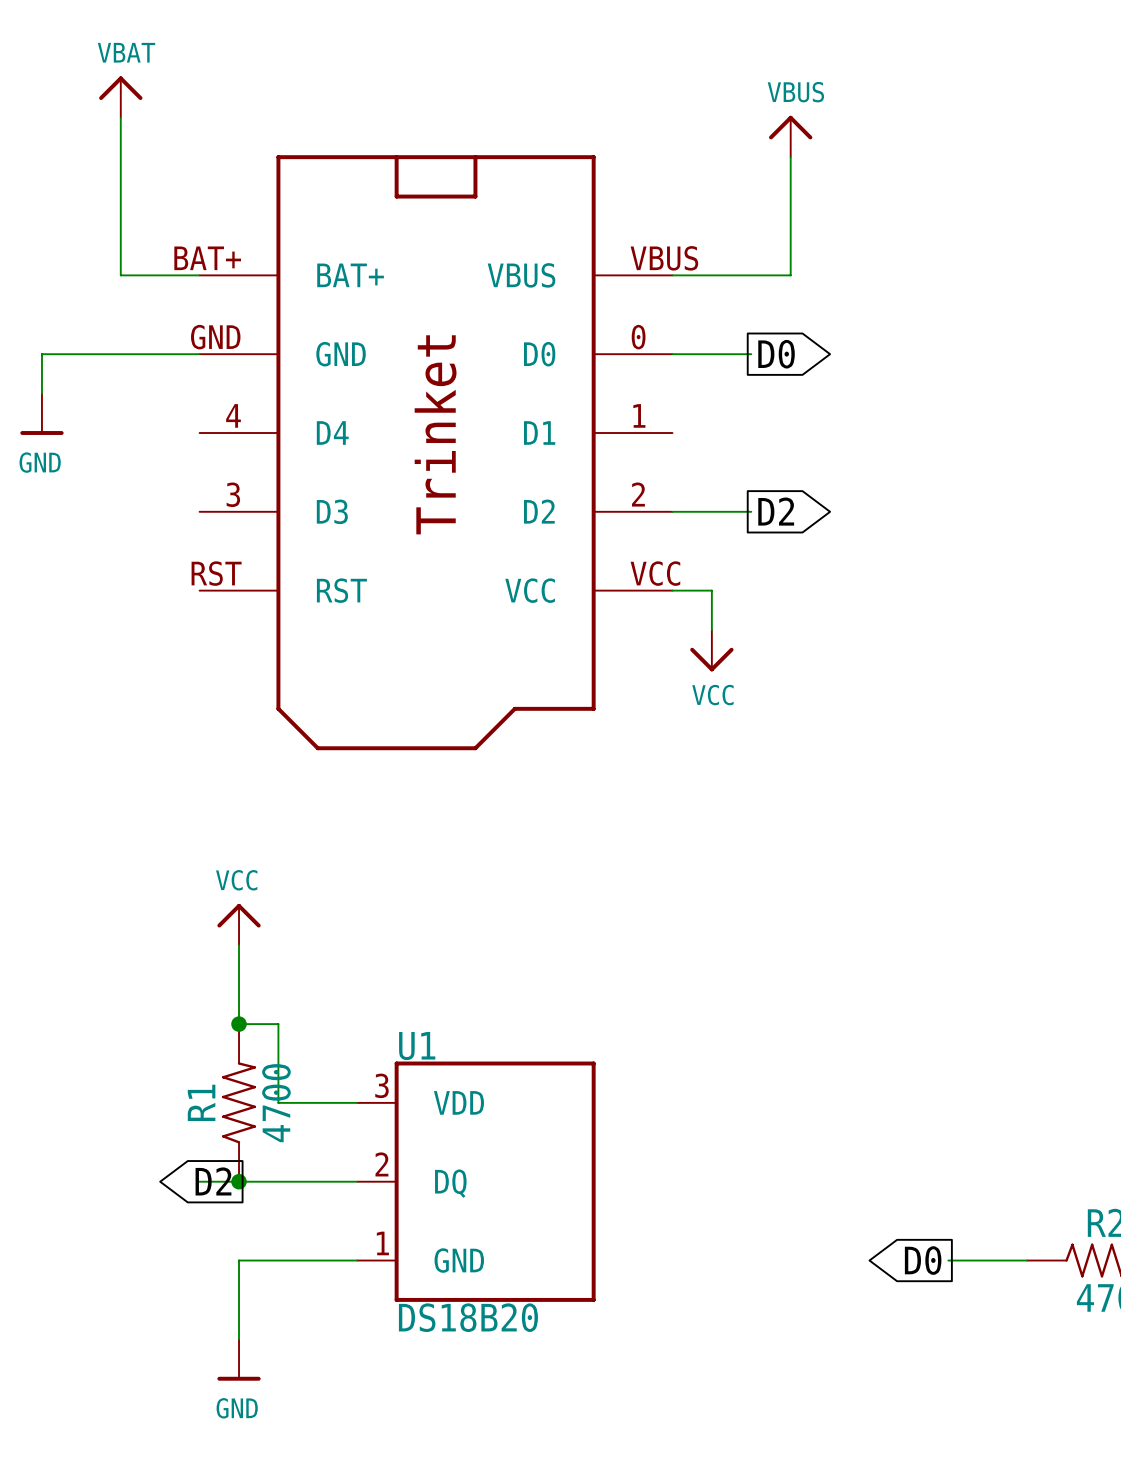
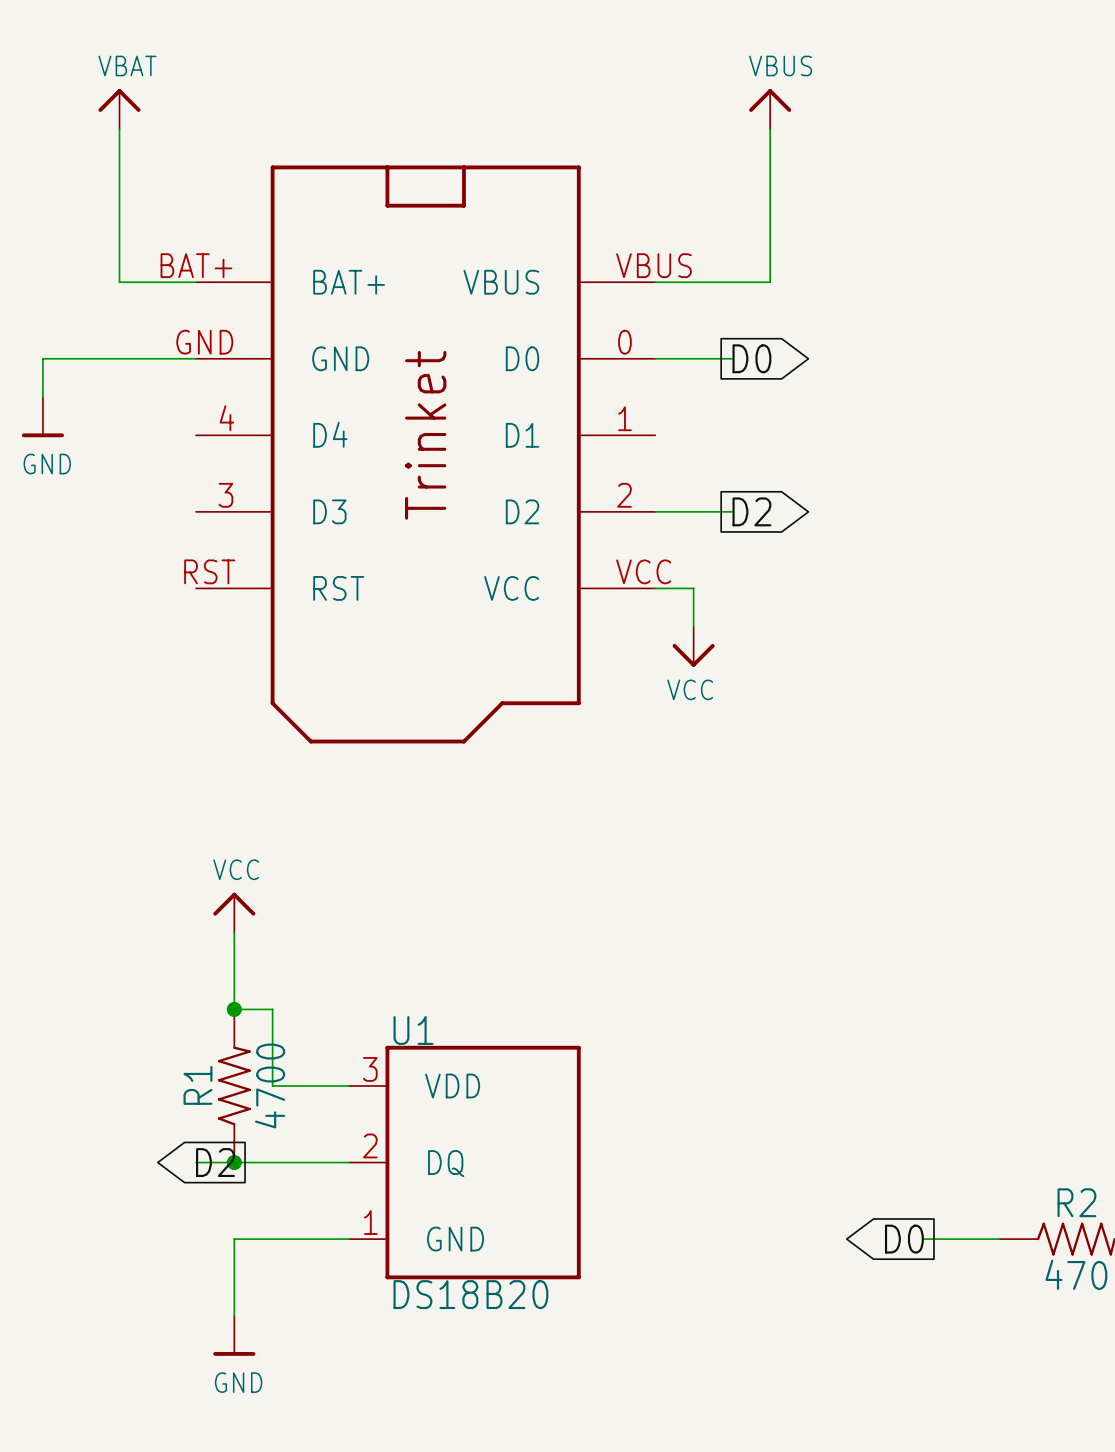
power symbol position: VBUS (790, 136) -> VBUS (770, 109)

